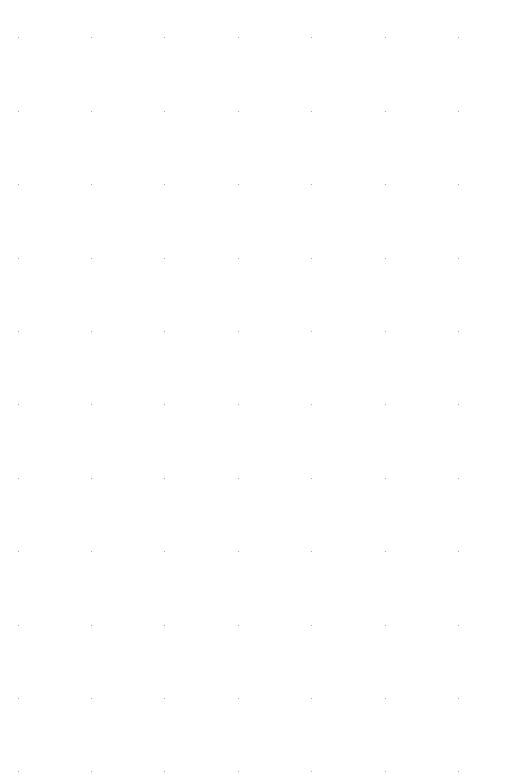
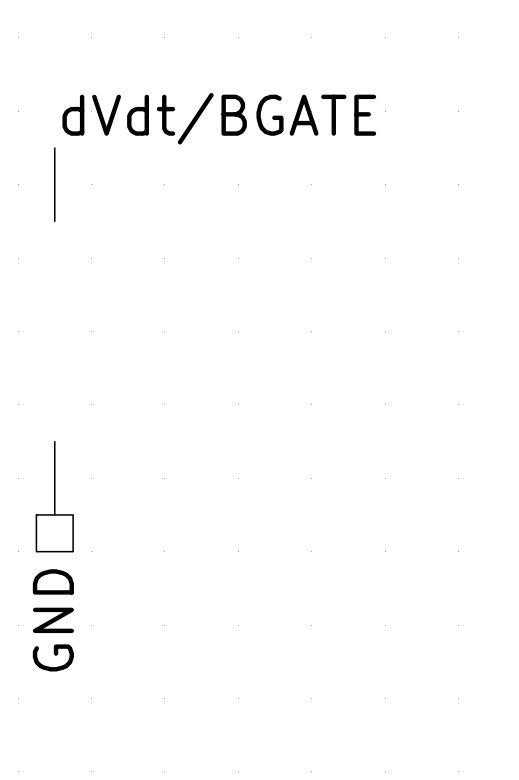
label: none -> dVdt/BGATE (219, 118)
wire: none -> (54, 147) (54, 221)
wire: none -> (54, 441) (54, 514)
hierarchical label: none -> GND (53, 620)

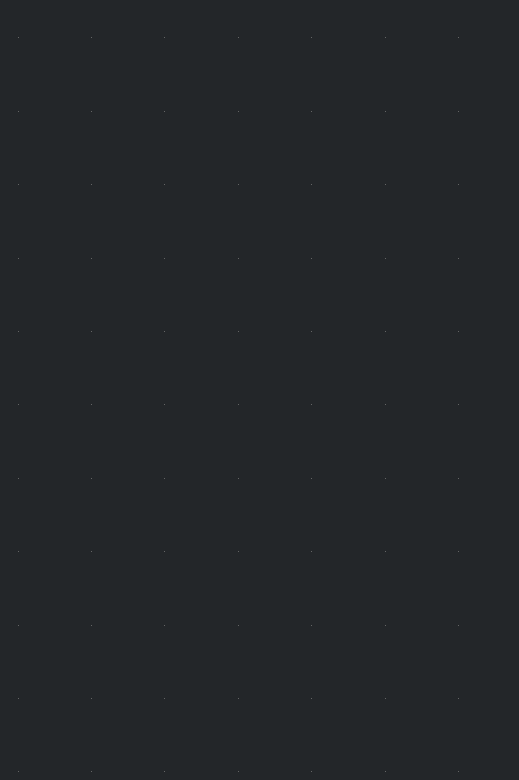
label: dVdt/BGATE (219, 118) -> none
wire: (54, 147) (54, 221) -> none
wire: (54, 441) (54, 514) -> none
hierarchical label: GND (53, 620) -> none

